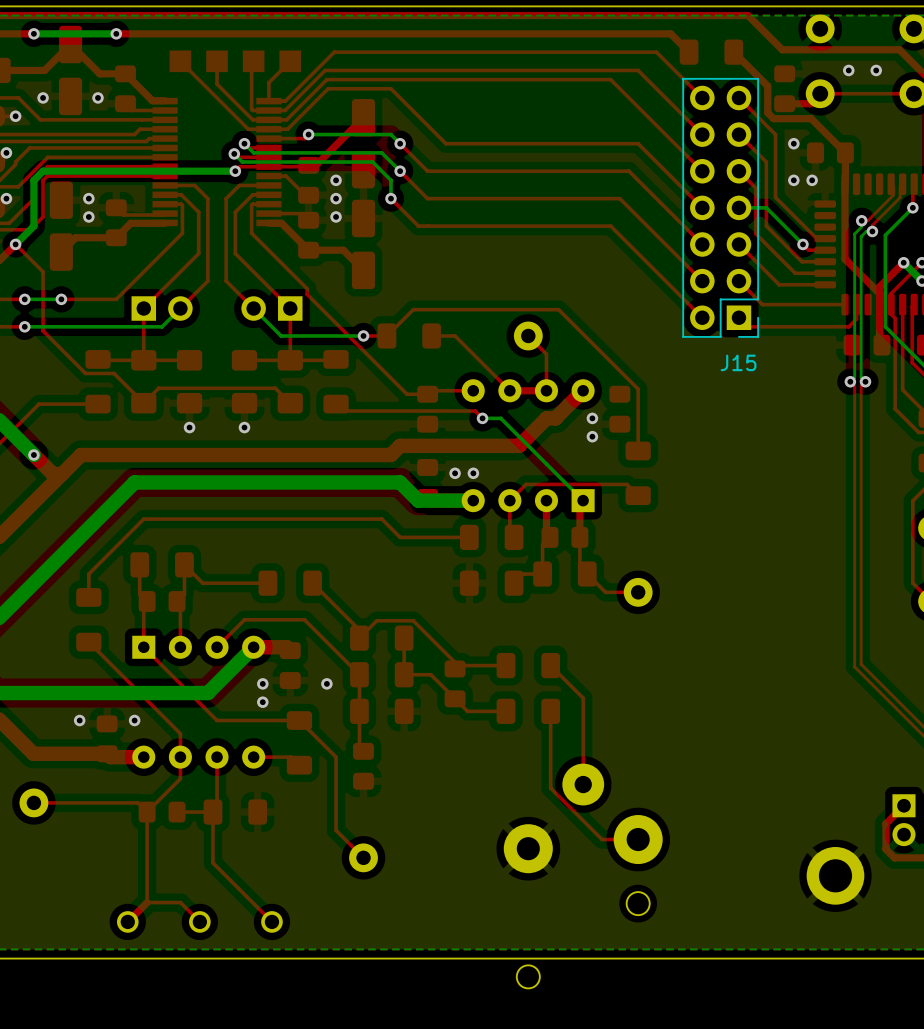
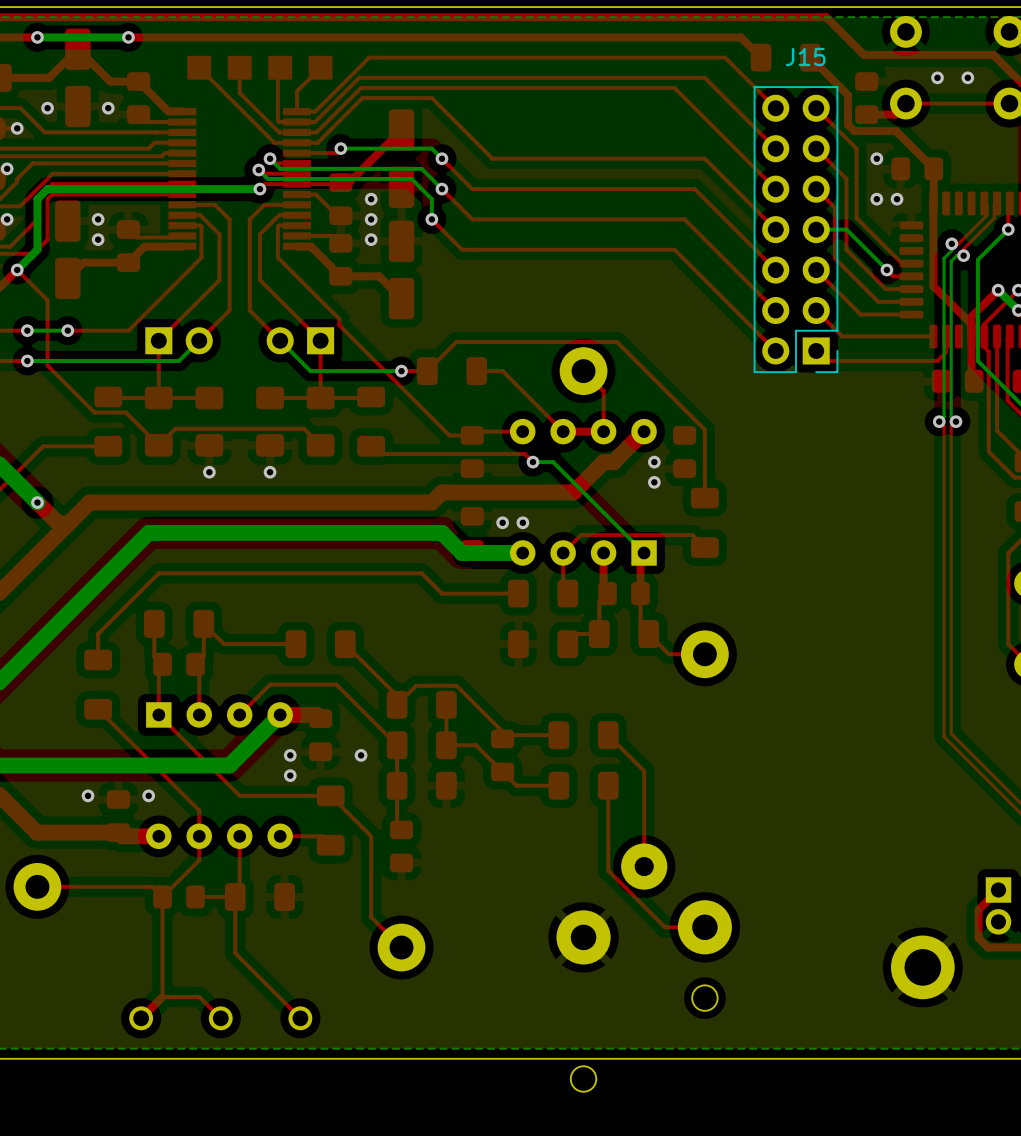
part footprint: [513, 321, 543, 351] -> [559, 347, 608, 395]
J15 name position: J15 (738, 362) -> J15 (805, 57)
part footprint: [623, 577, 653, 607] -> [681, 630, 729, 679]
part footprint: [19, 788, 49, 818] -> [13, 862, 62, 911]
part footprint: [349, 843, 378, 873] -> [377, 923, 426, 972]

